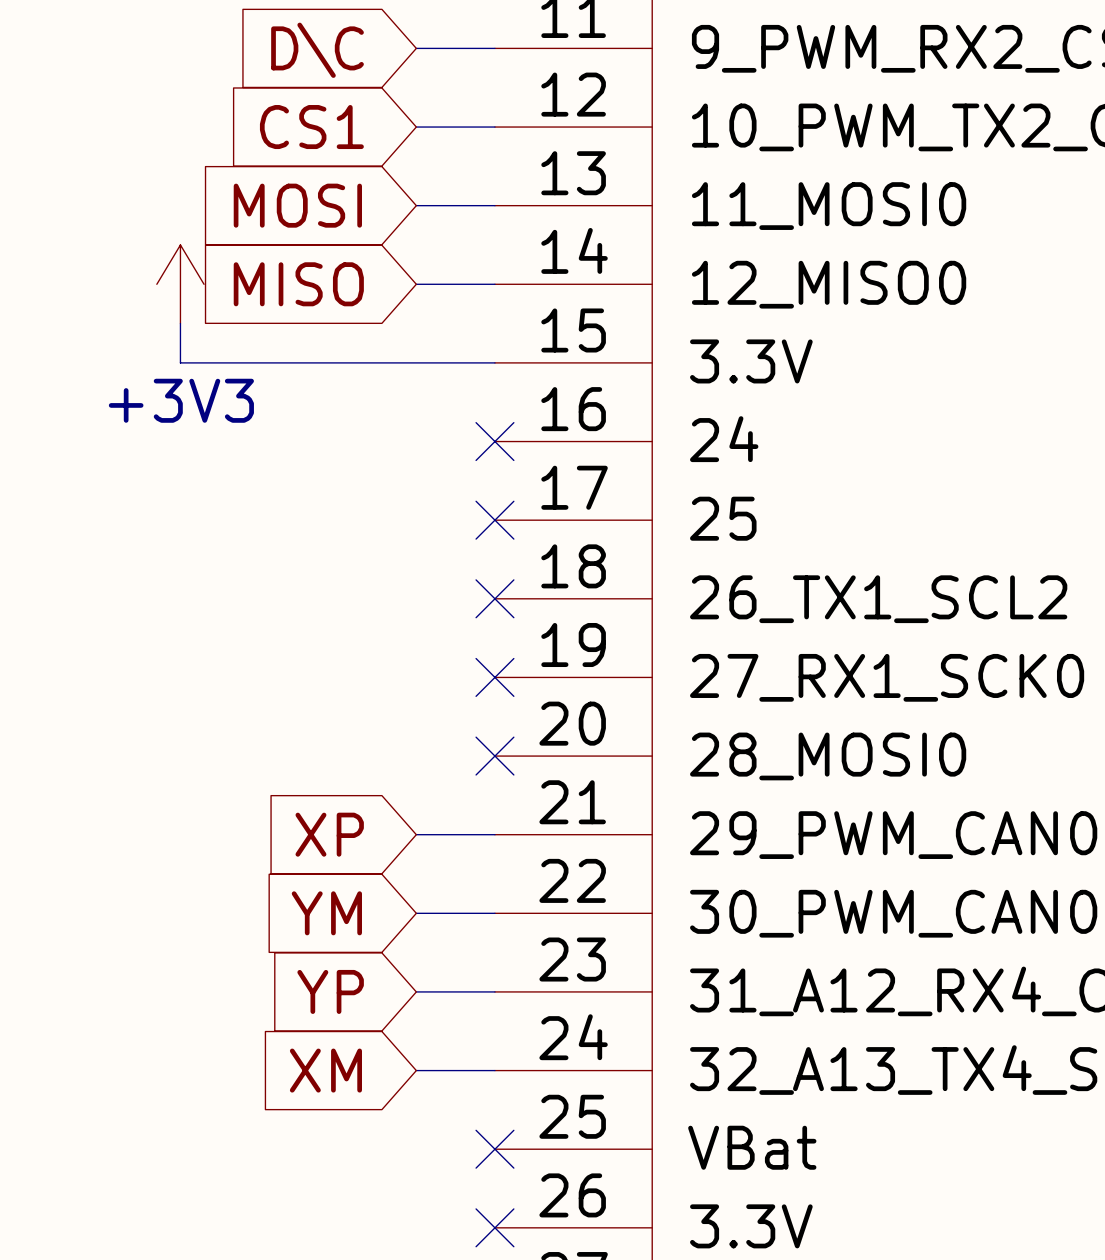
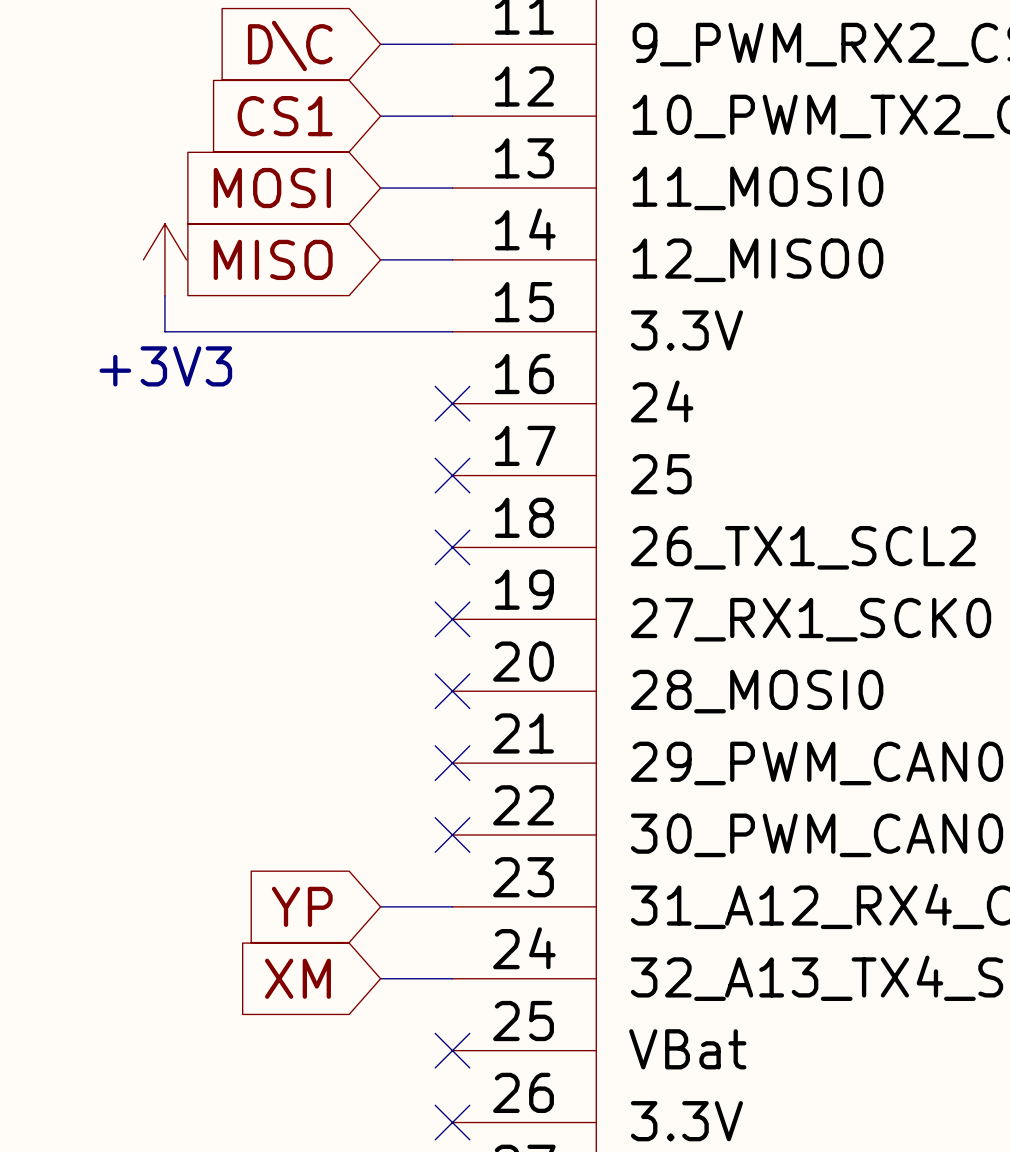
global label: XP (329, 834) -> none
wire: (416, 834) (494, 834) -> none
no-connect mark: none -> (452, 763)
global label: YM (326, 913) -> none
wire: (416, 913) (494, 913) -> none
no-connect mark: none -> (452, 834)

